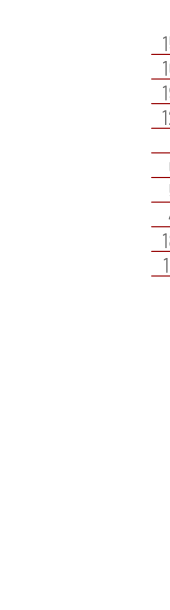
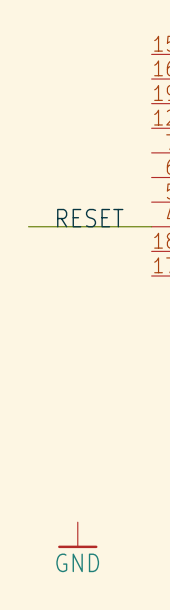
label: none -> RESET (90, 218)
wire: none -> (28, 226) (151, 226)
power symbol: none -> GND (77, 535)

